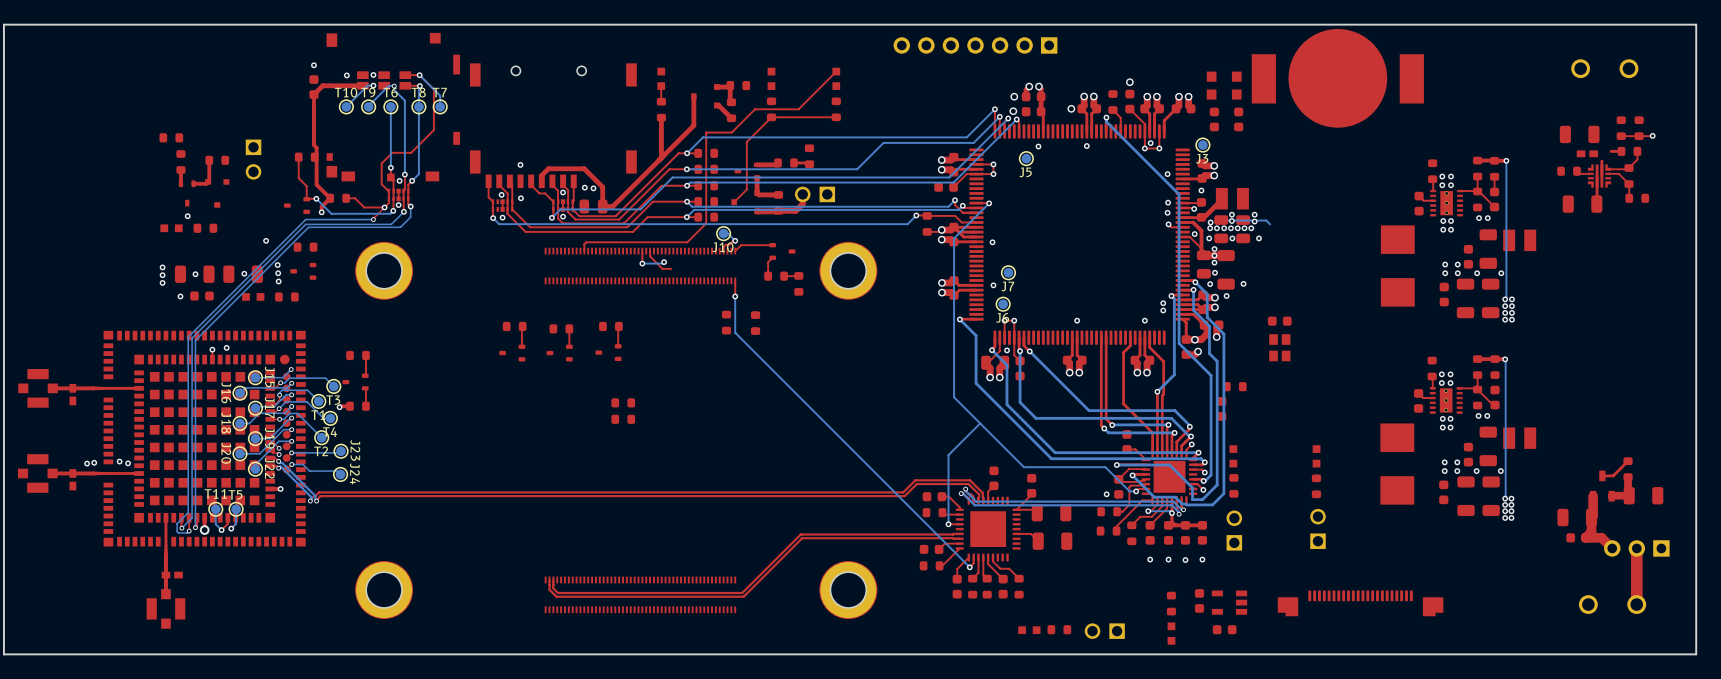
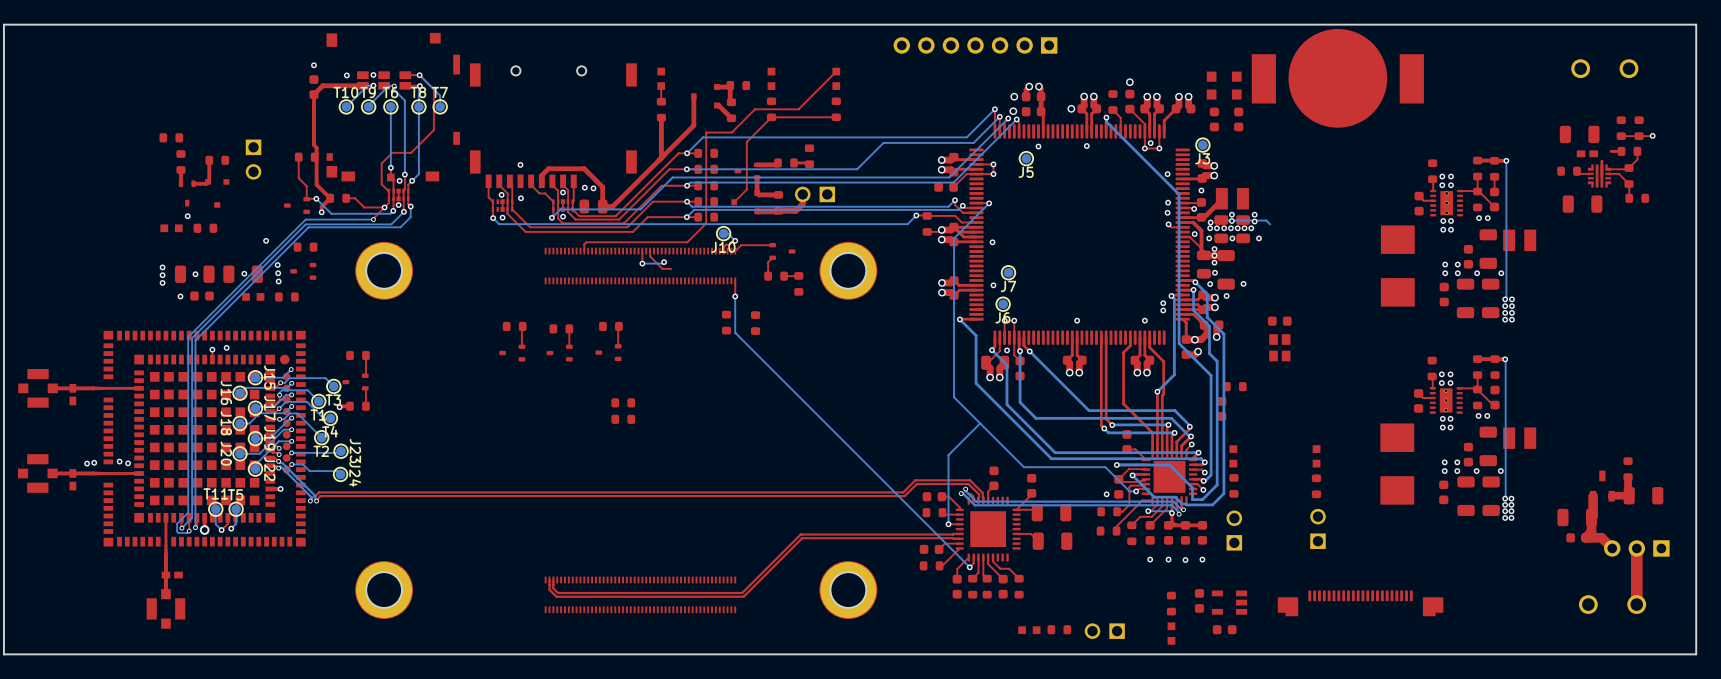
top track: (1597, 176) (1596, 204) -> none
top track: (1628, 461) (1613, 475) (1602, 475) -> none

